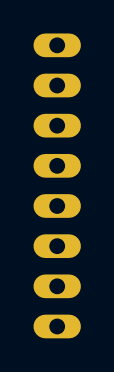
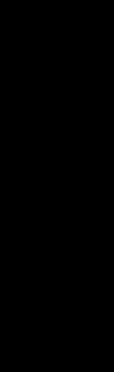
part: (57, 185) -> none

